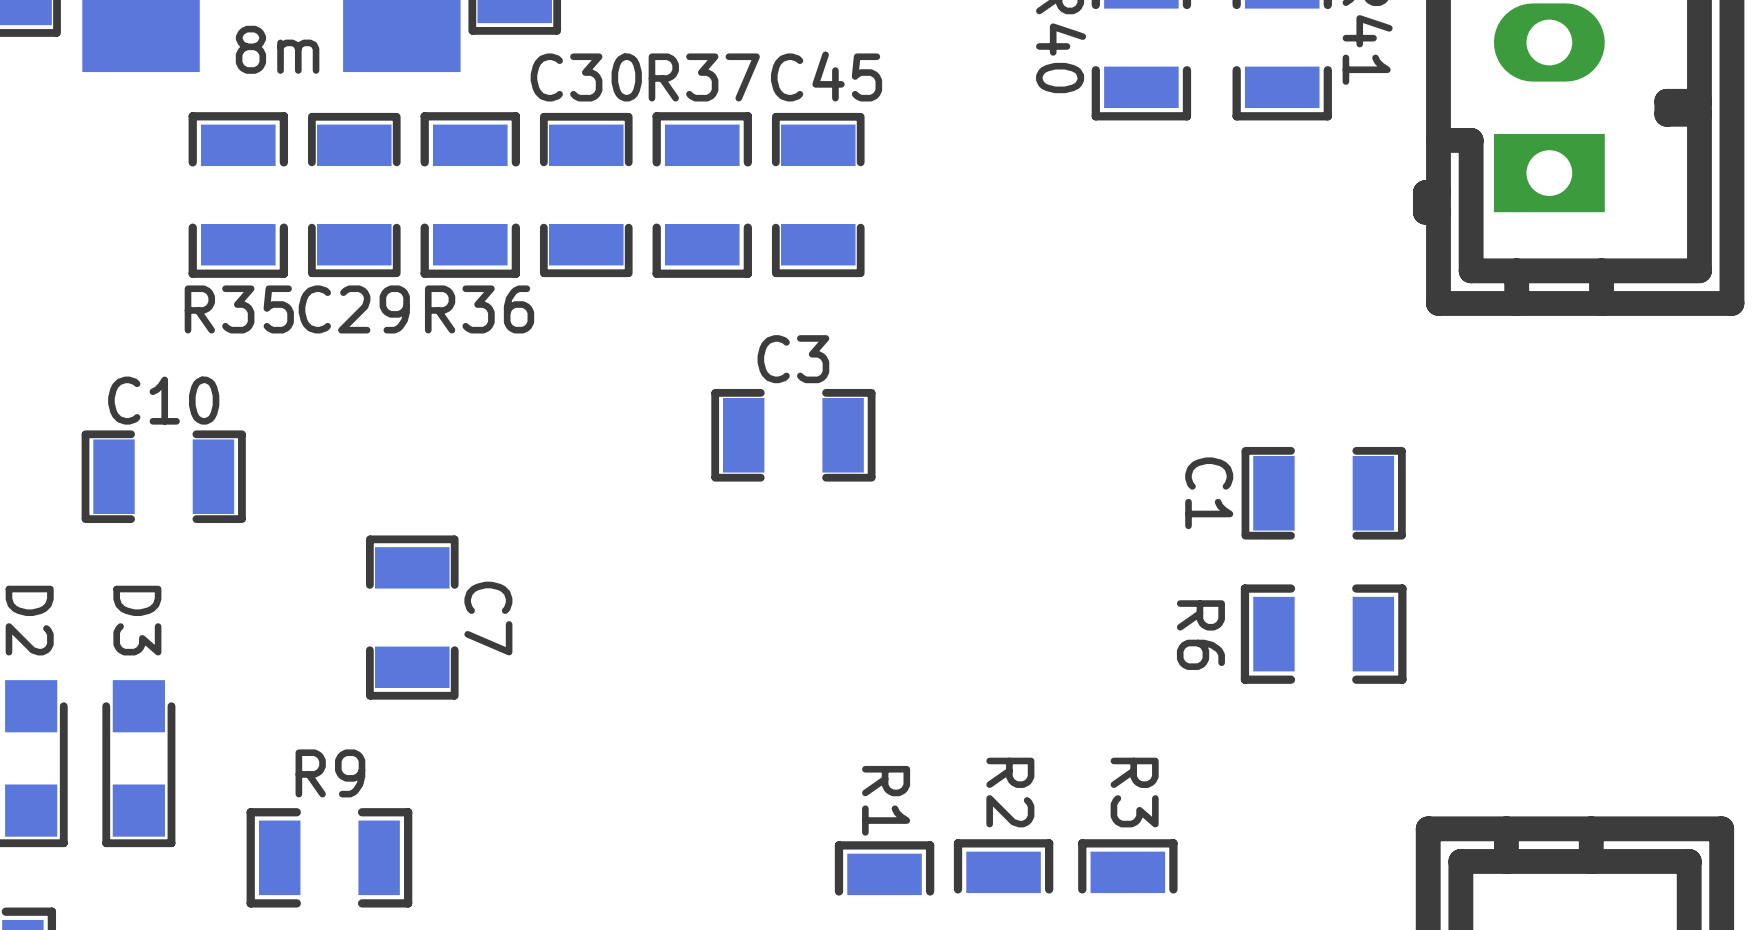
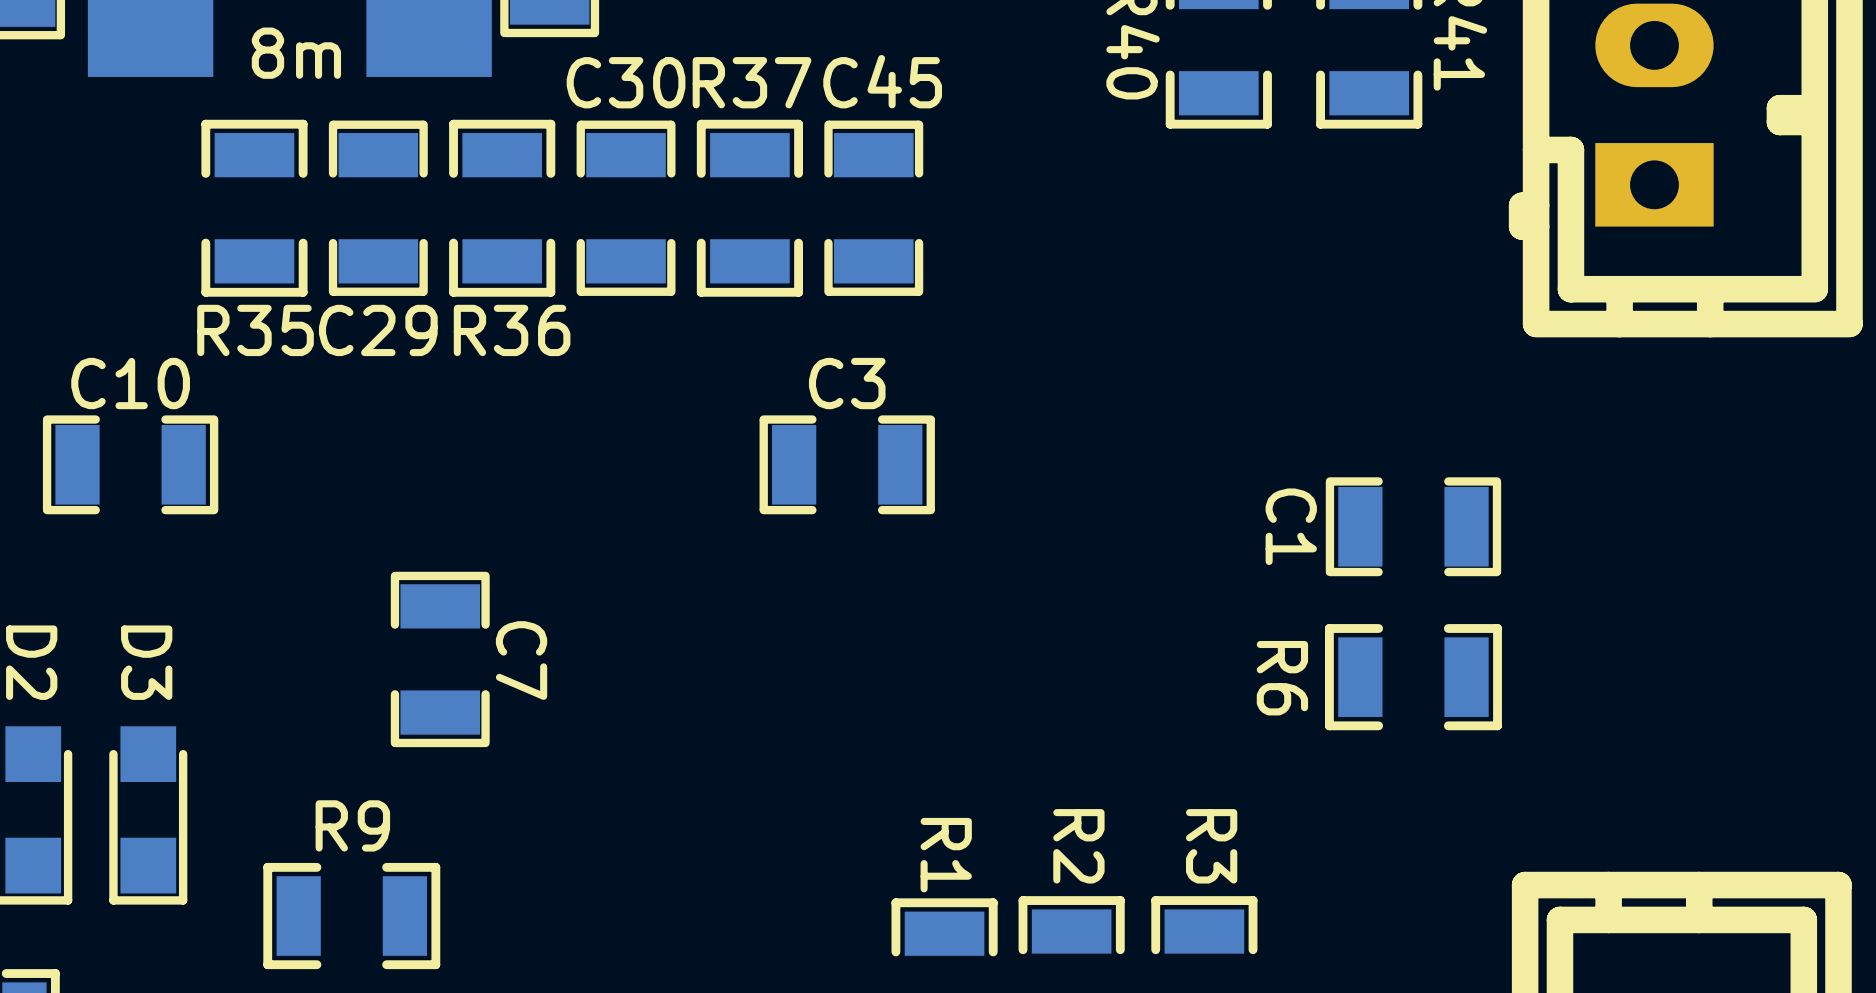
C10 position: (163, 476) -> (130, 464)

